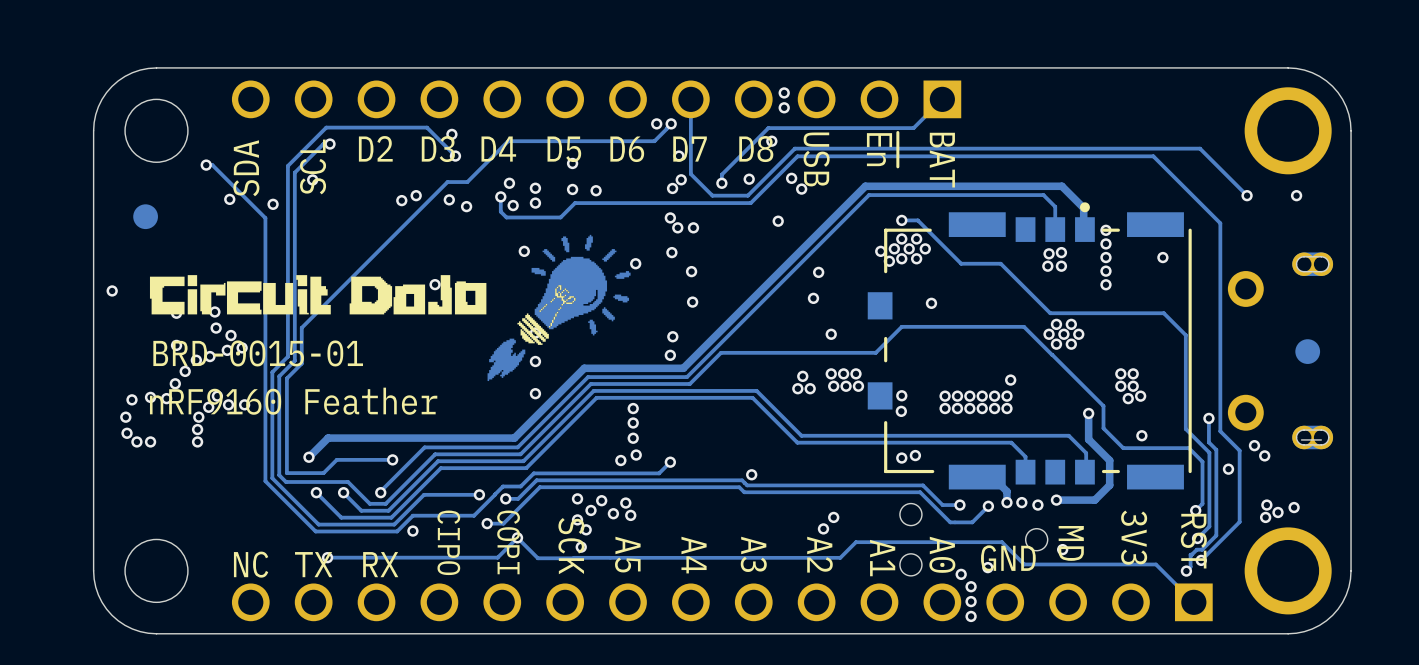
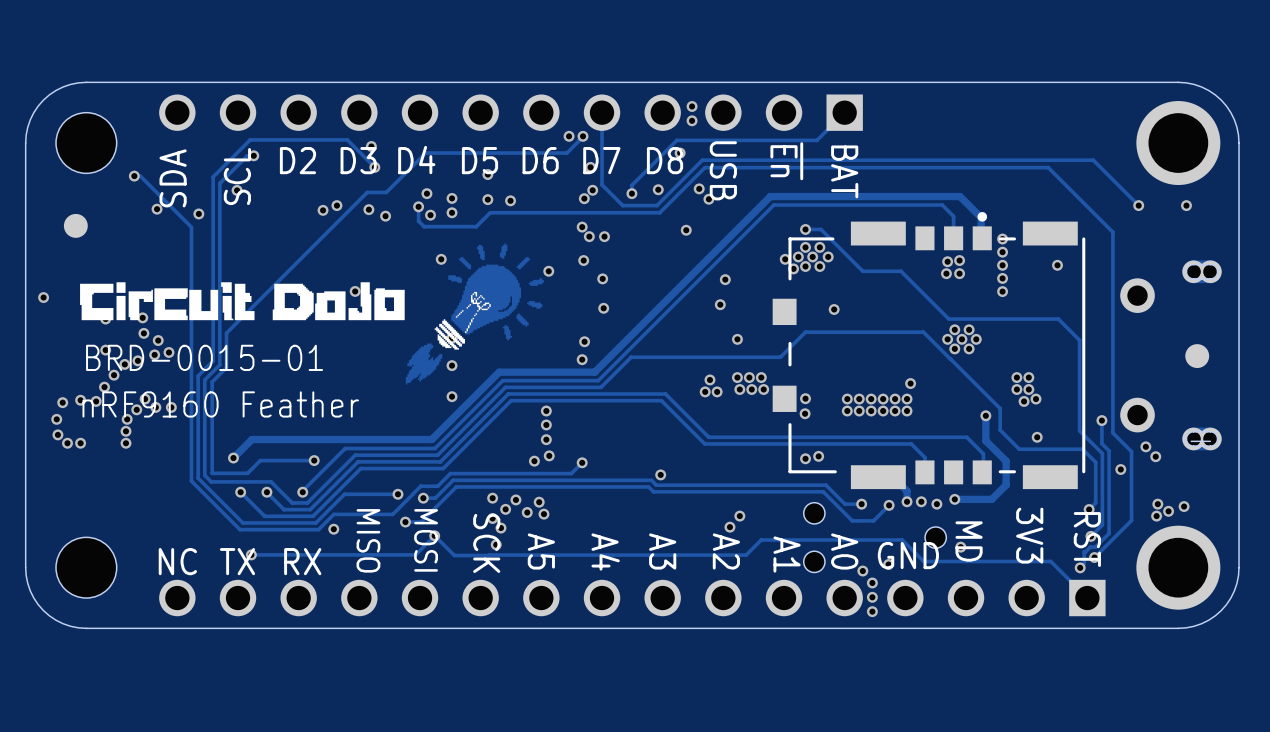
text: CIPO (448, 542) -> MISO (368, 540)
text: COPI (508, 542) -> MOSI (426, 540)

